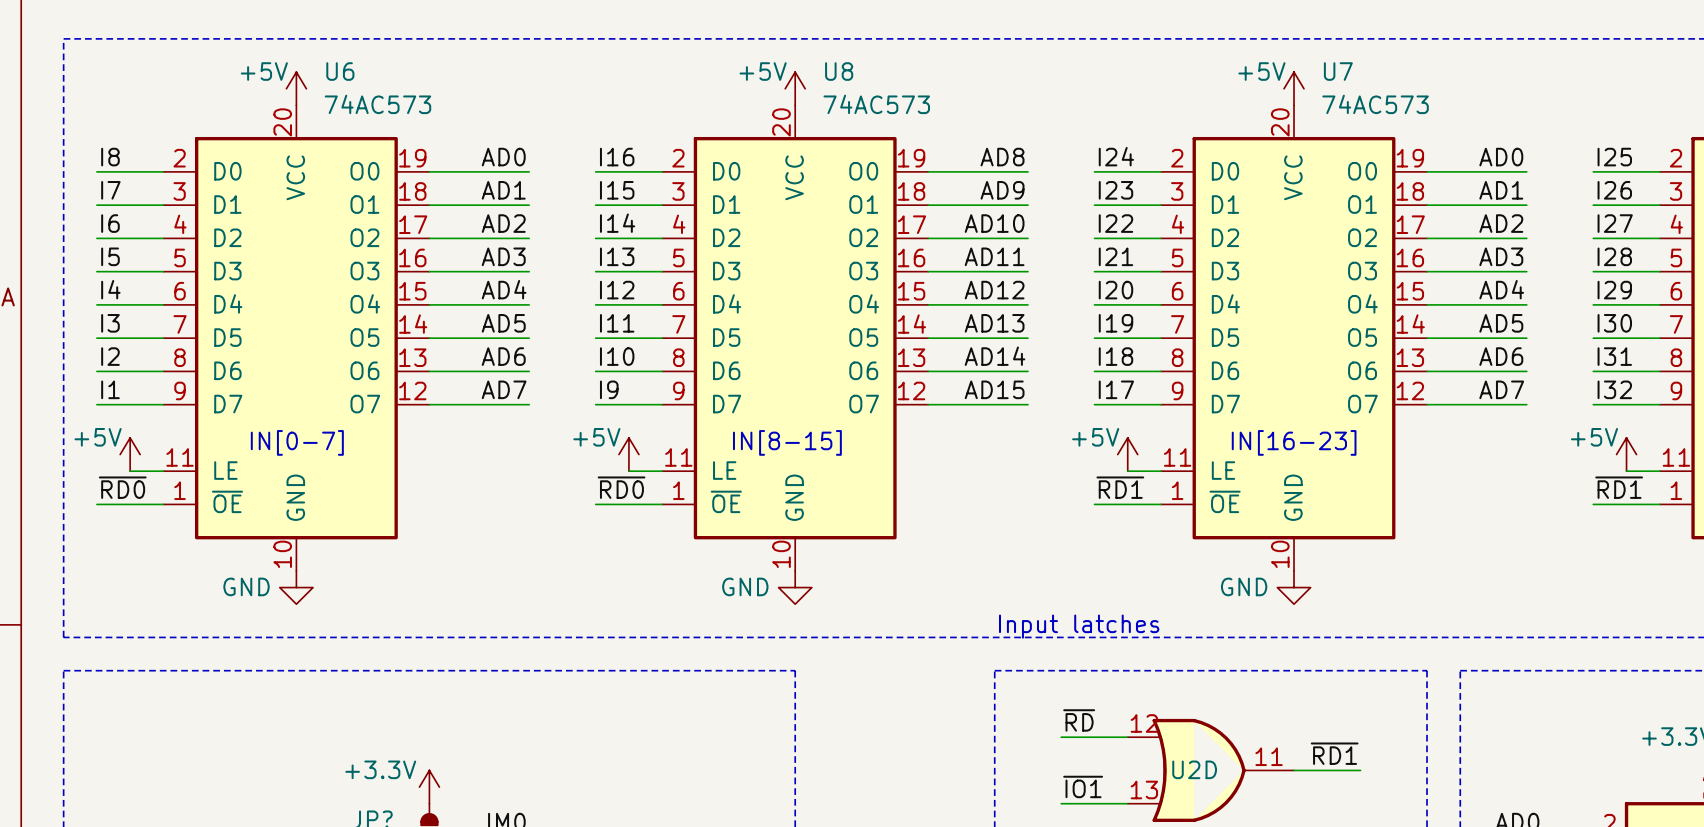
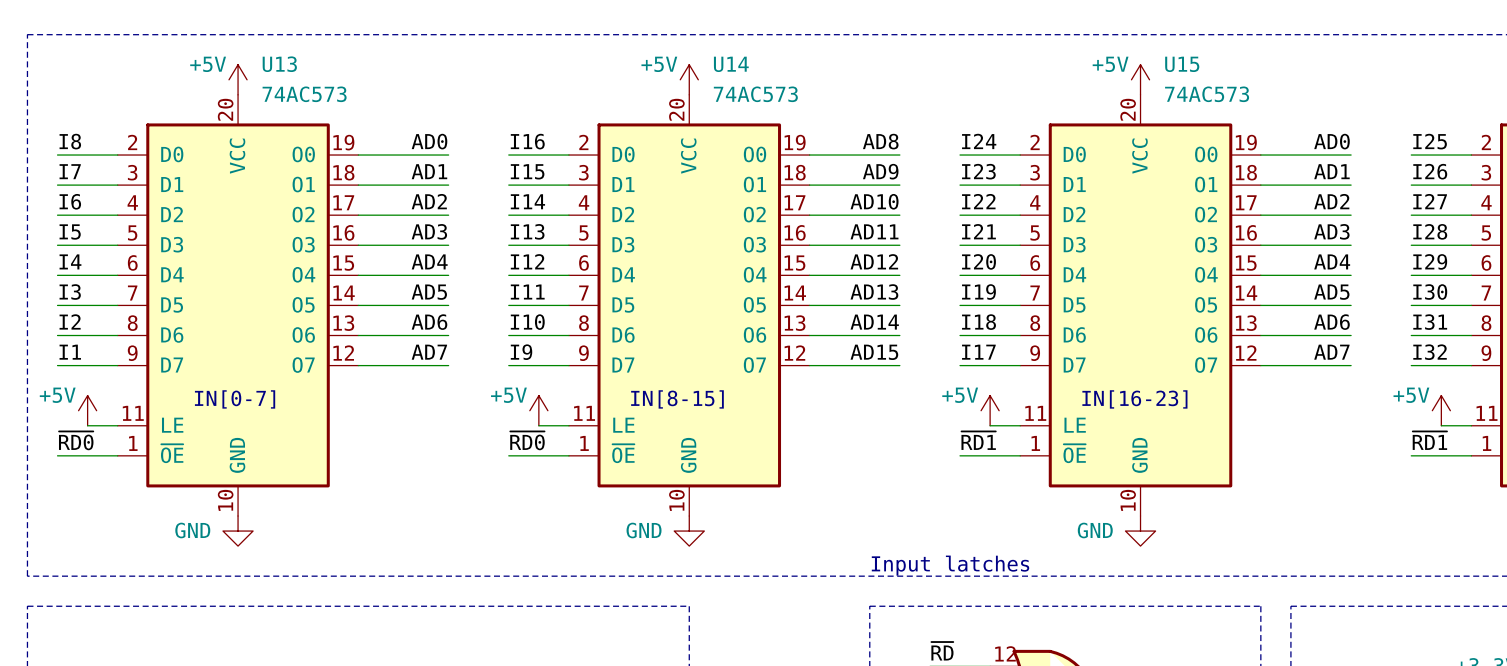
U6 name: U6 (340, 71) -> U13 (279, 64)
U8 name: U8 (839, 71) -> U14 (731, 64)
U7 name: U7 (1338, 71) -> U15 (1182, 64)

